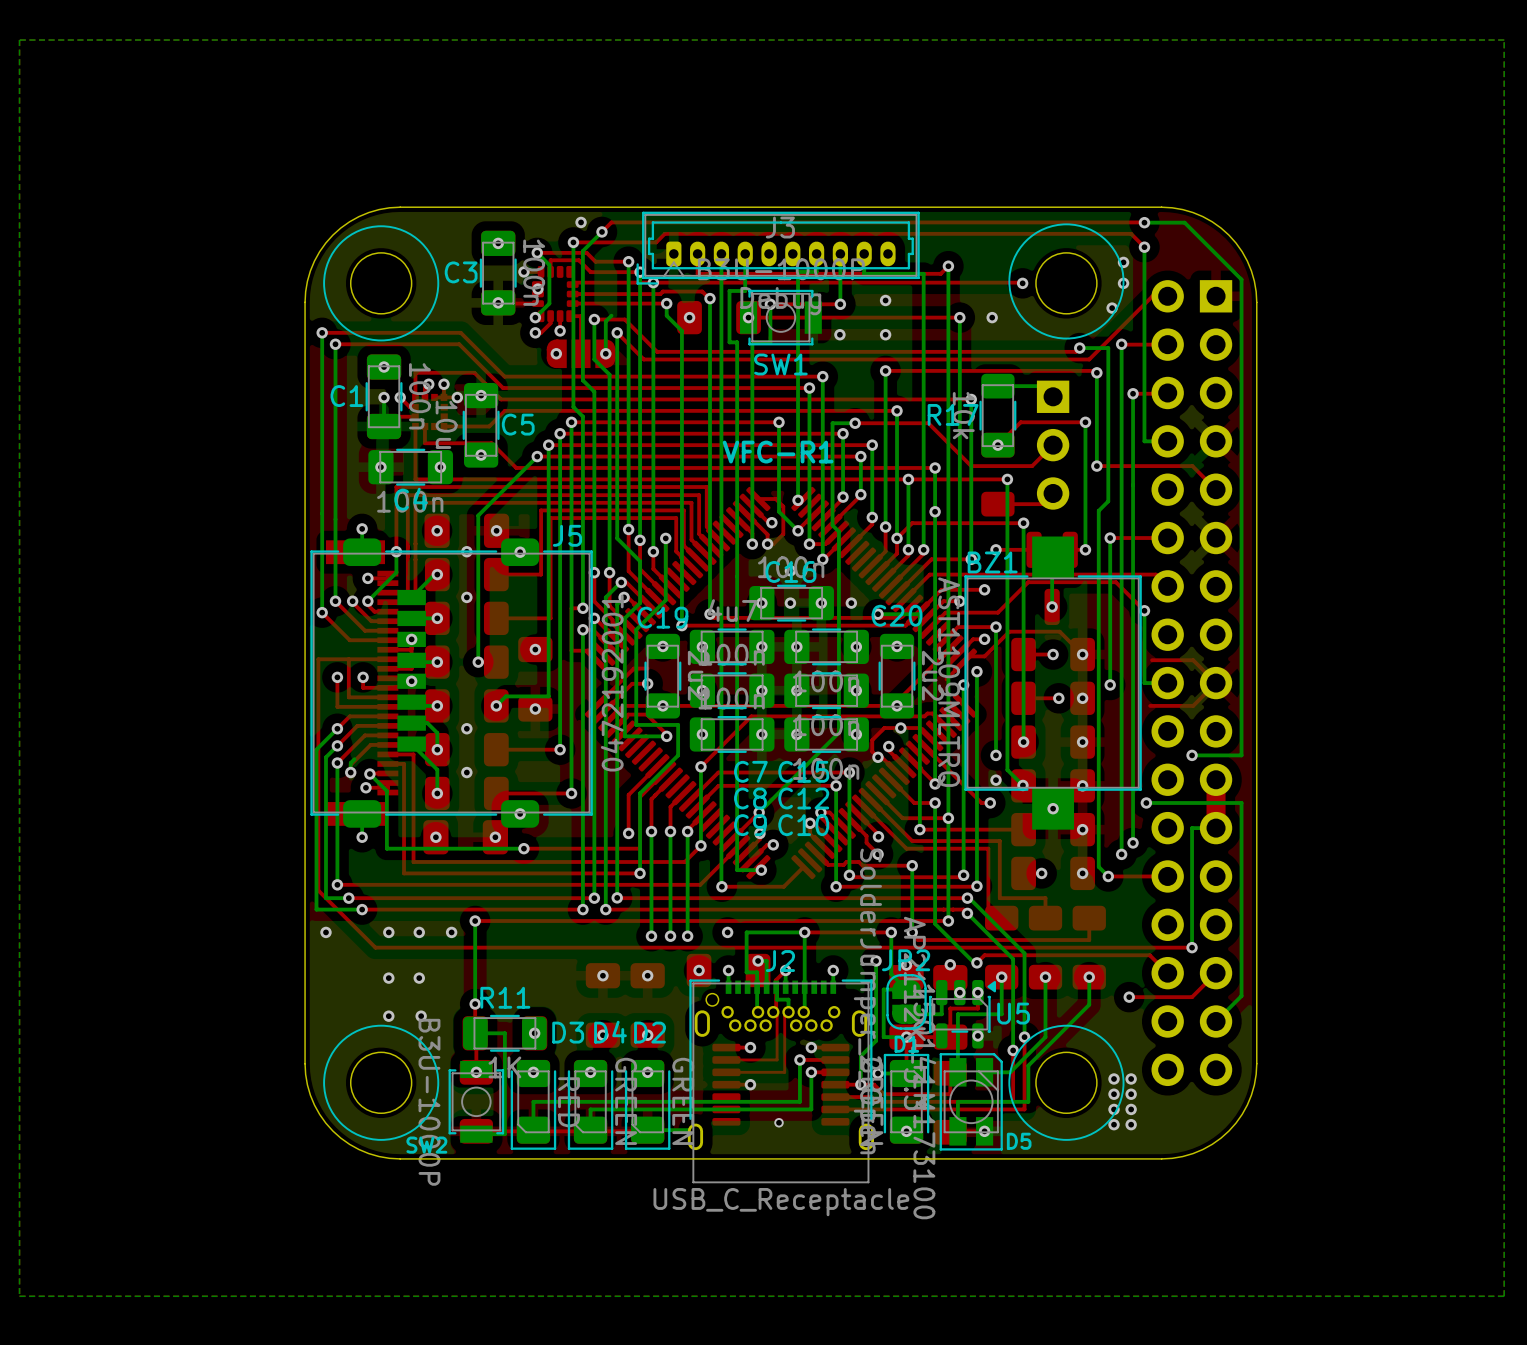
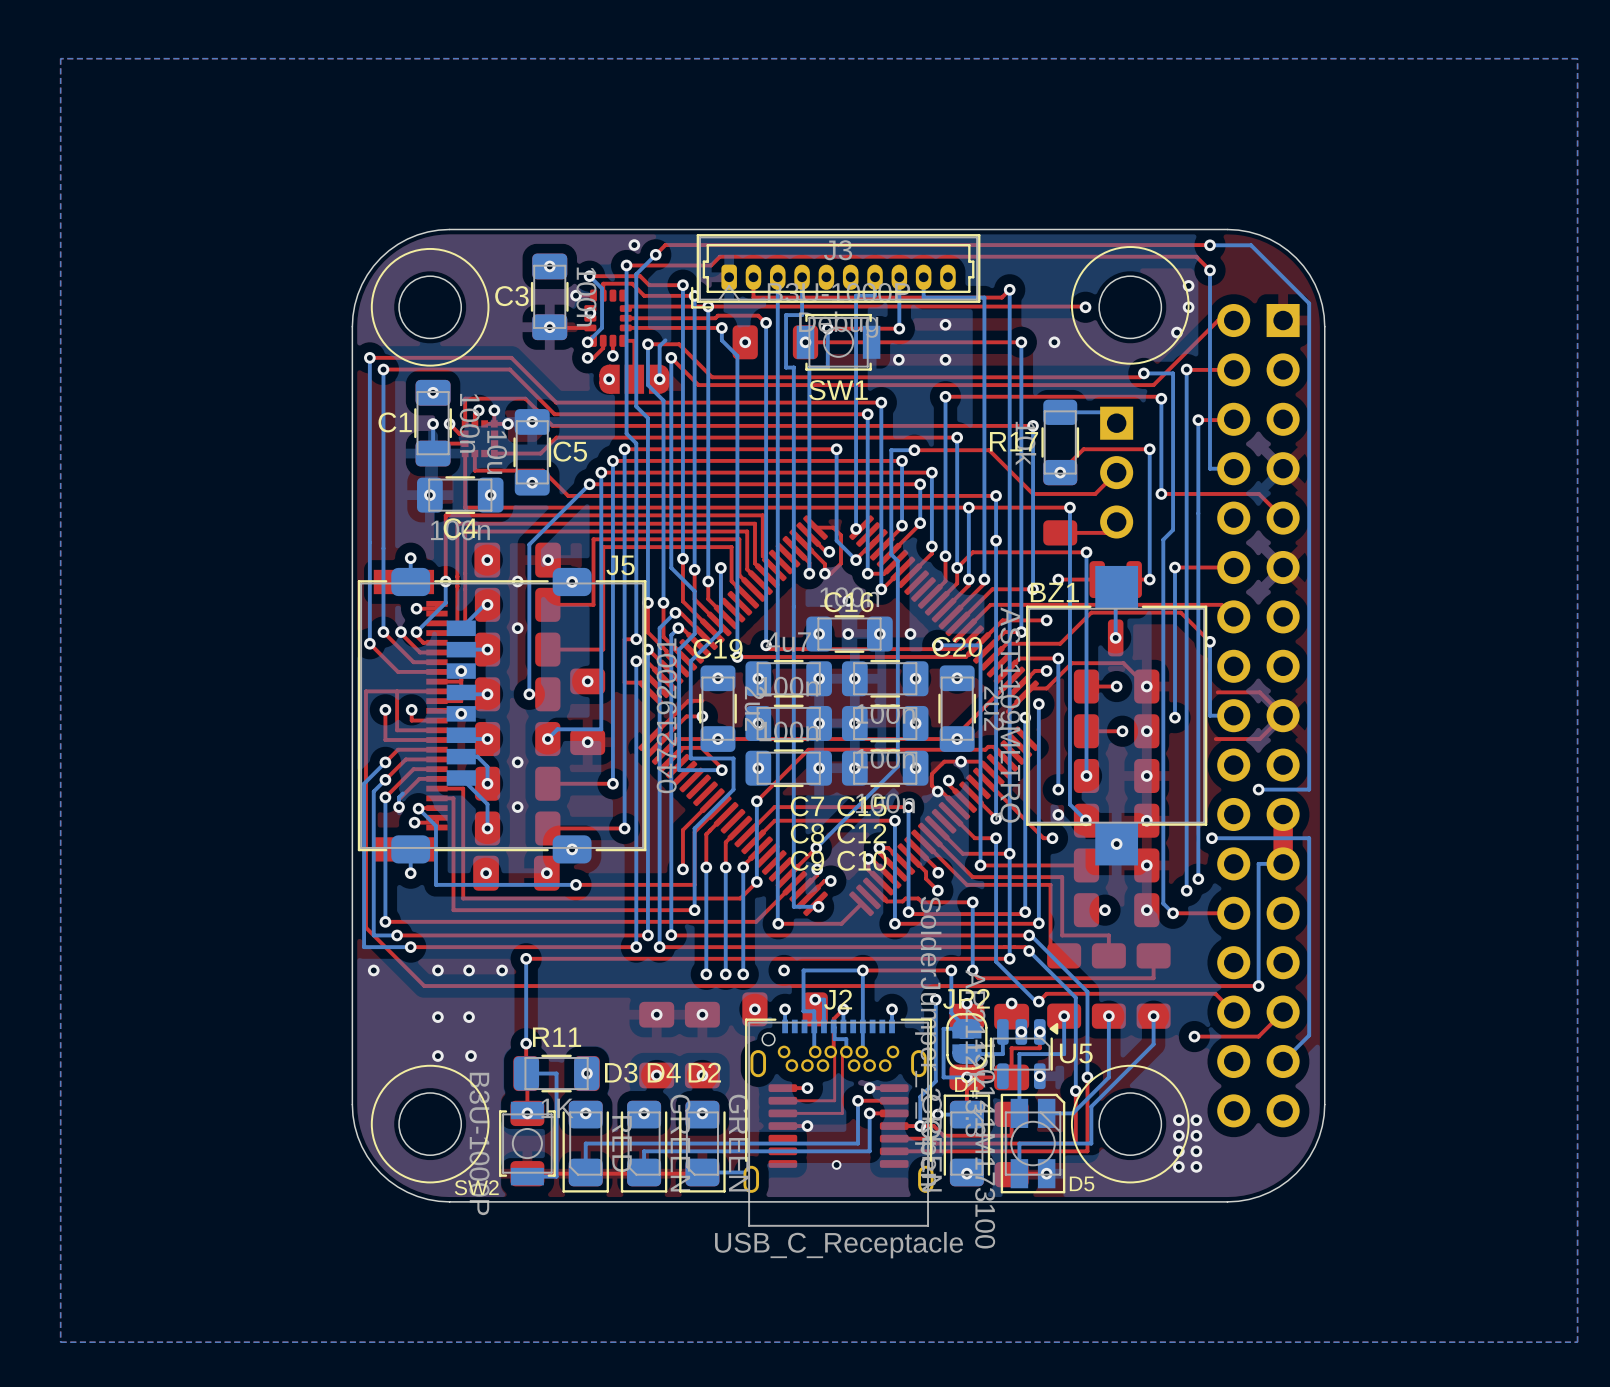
text: VFC-R1 (778, 452) -> none
U5 footprint: [928, 980, 996, 1049] -> [989, 1019, 1059, 1090]

